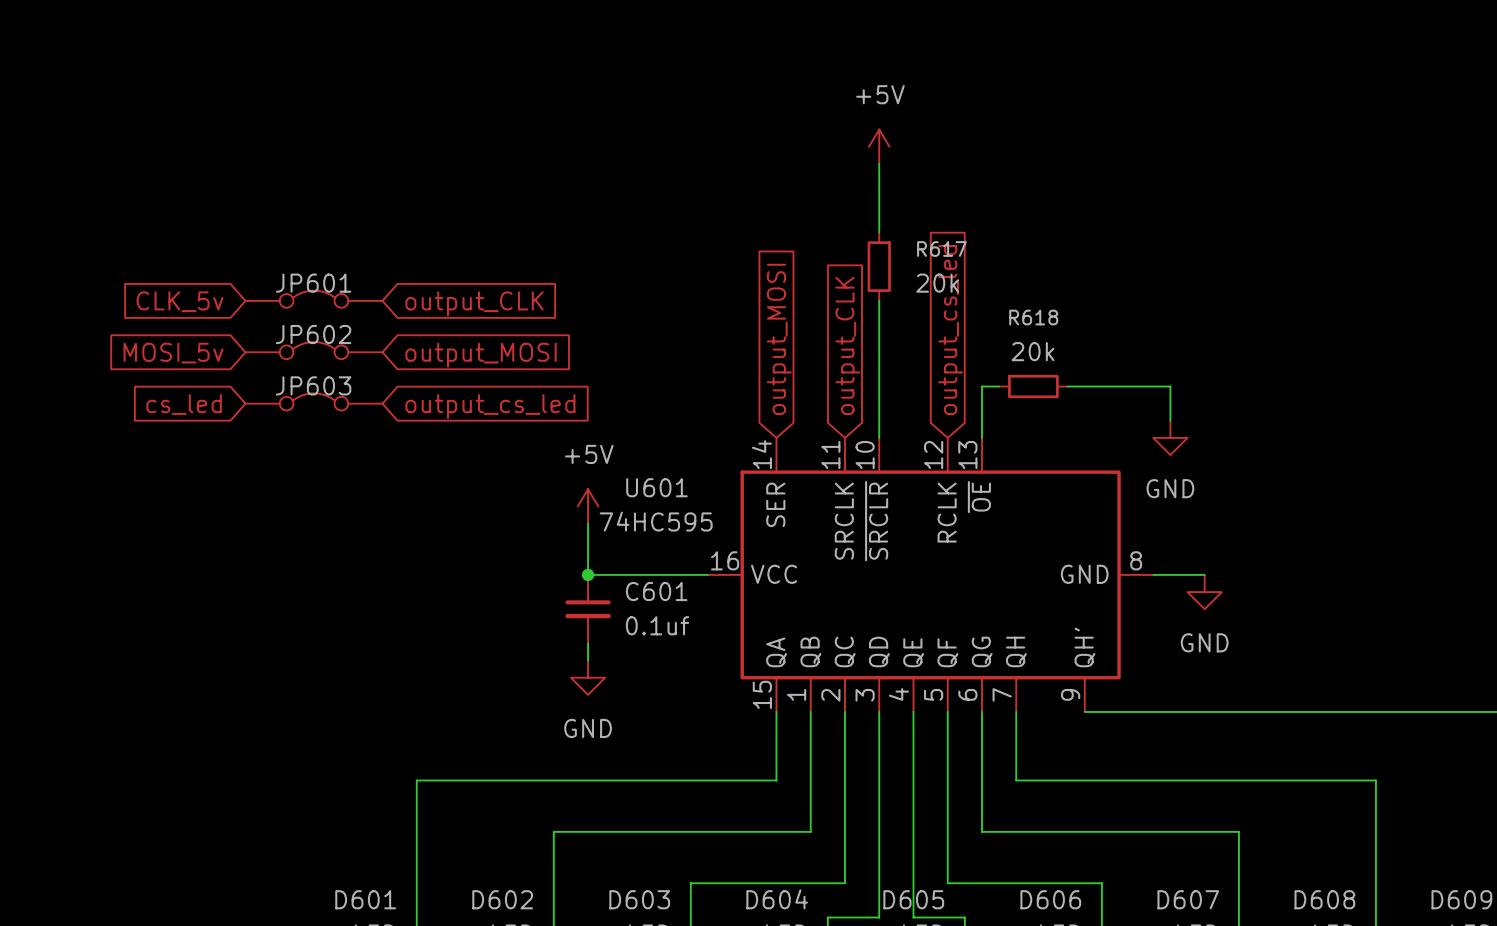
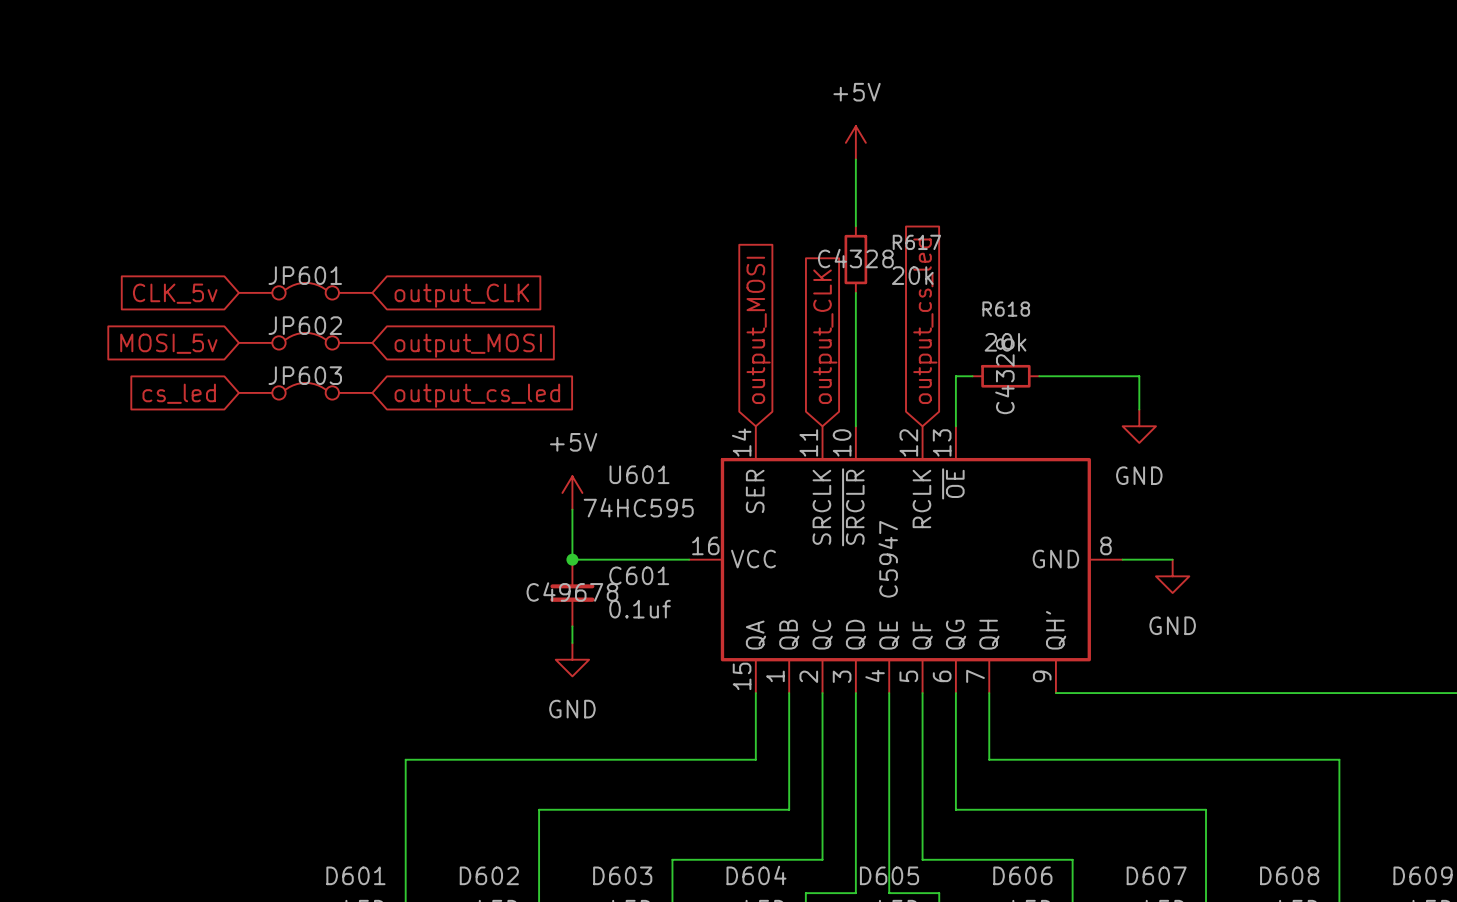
R617 text: none -> C4328 (855, 258)
R618 text: none -> C4328 (1004, 376)
U601 text: none -> C5947 (888, 559)
C601 text: none -> C49678 (572, 591)

